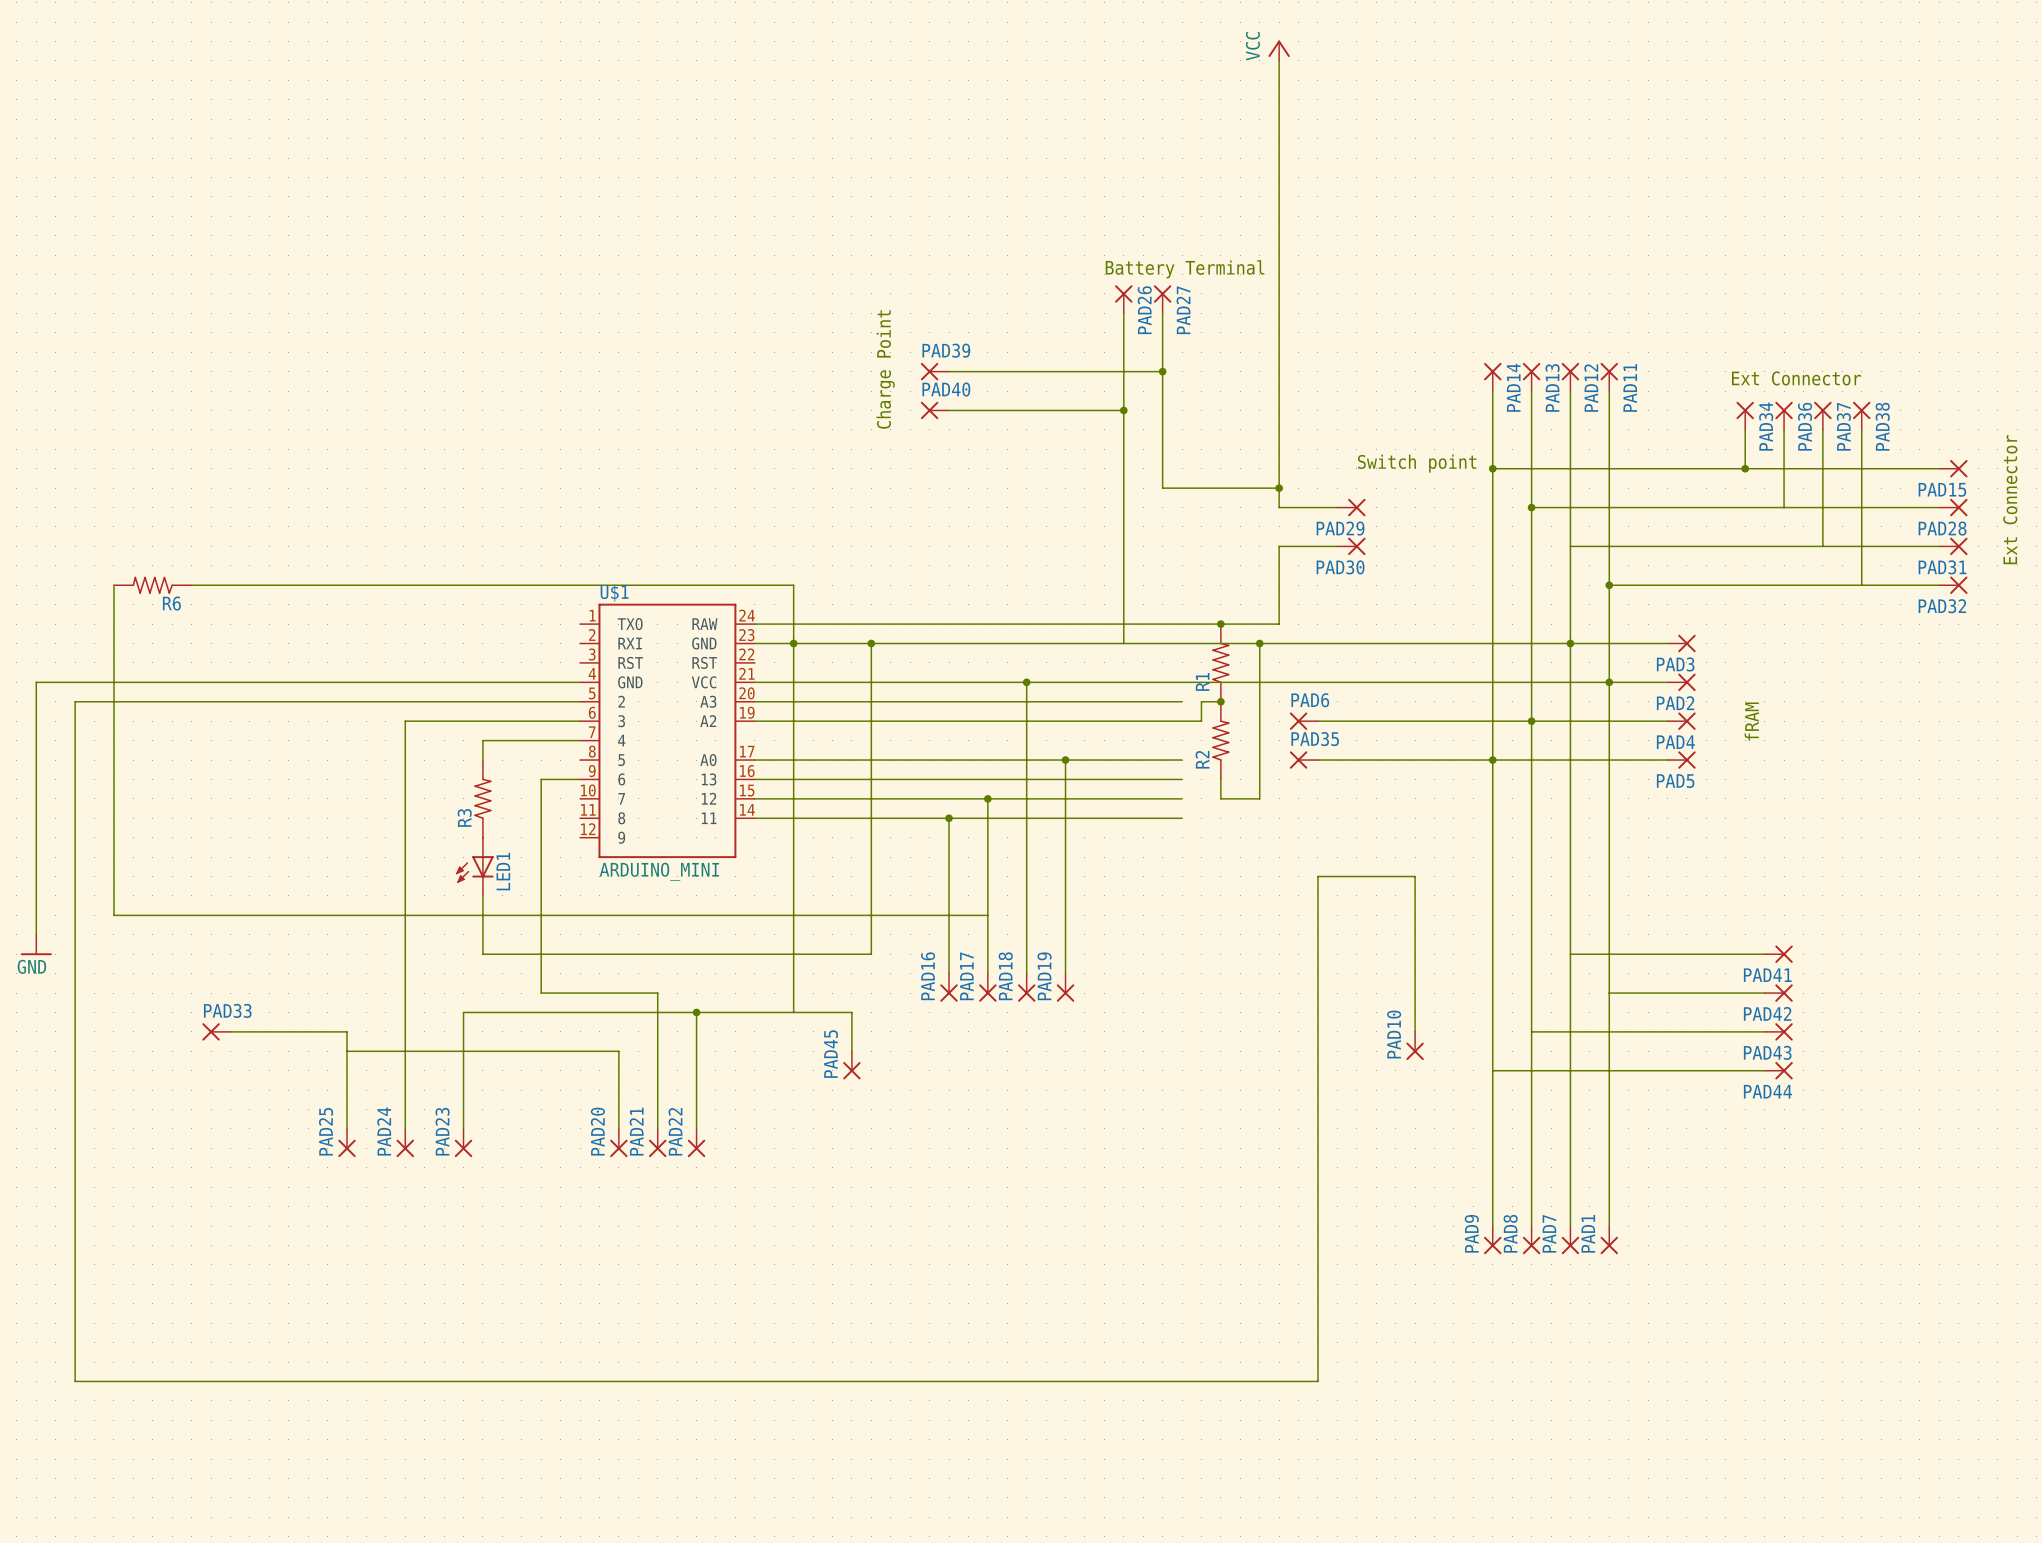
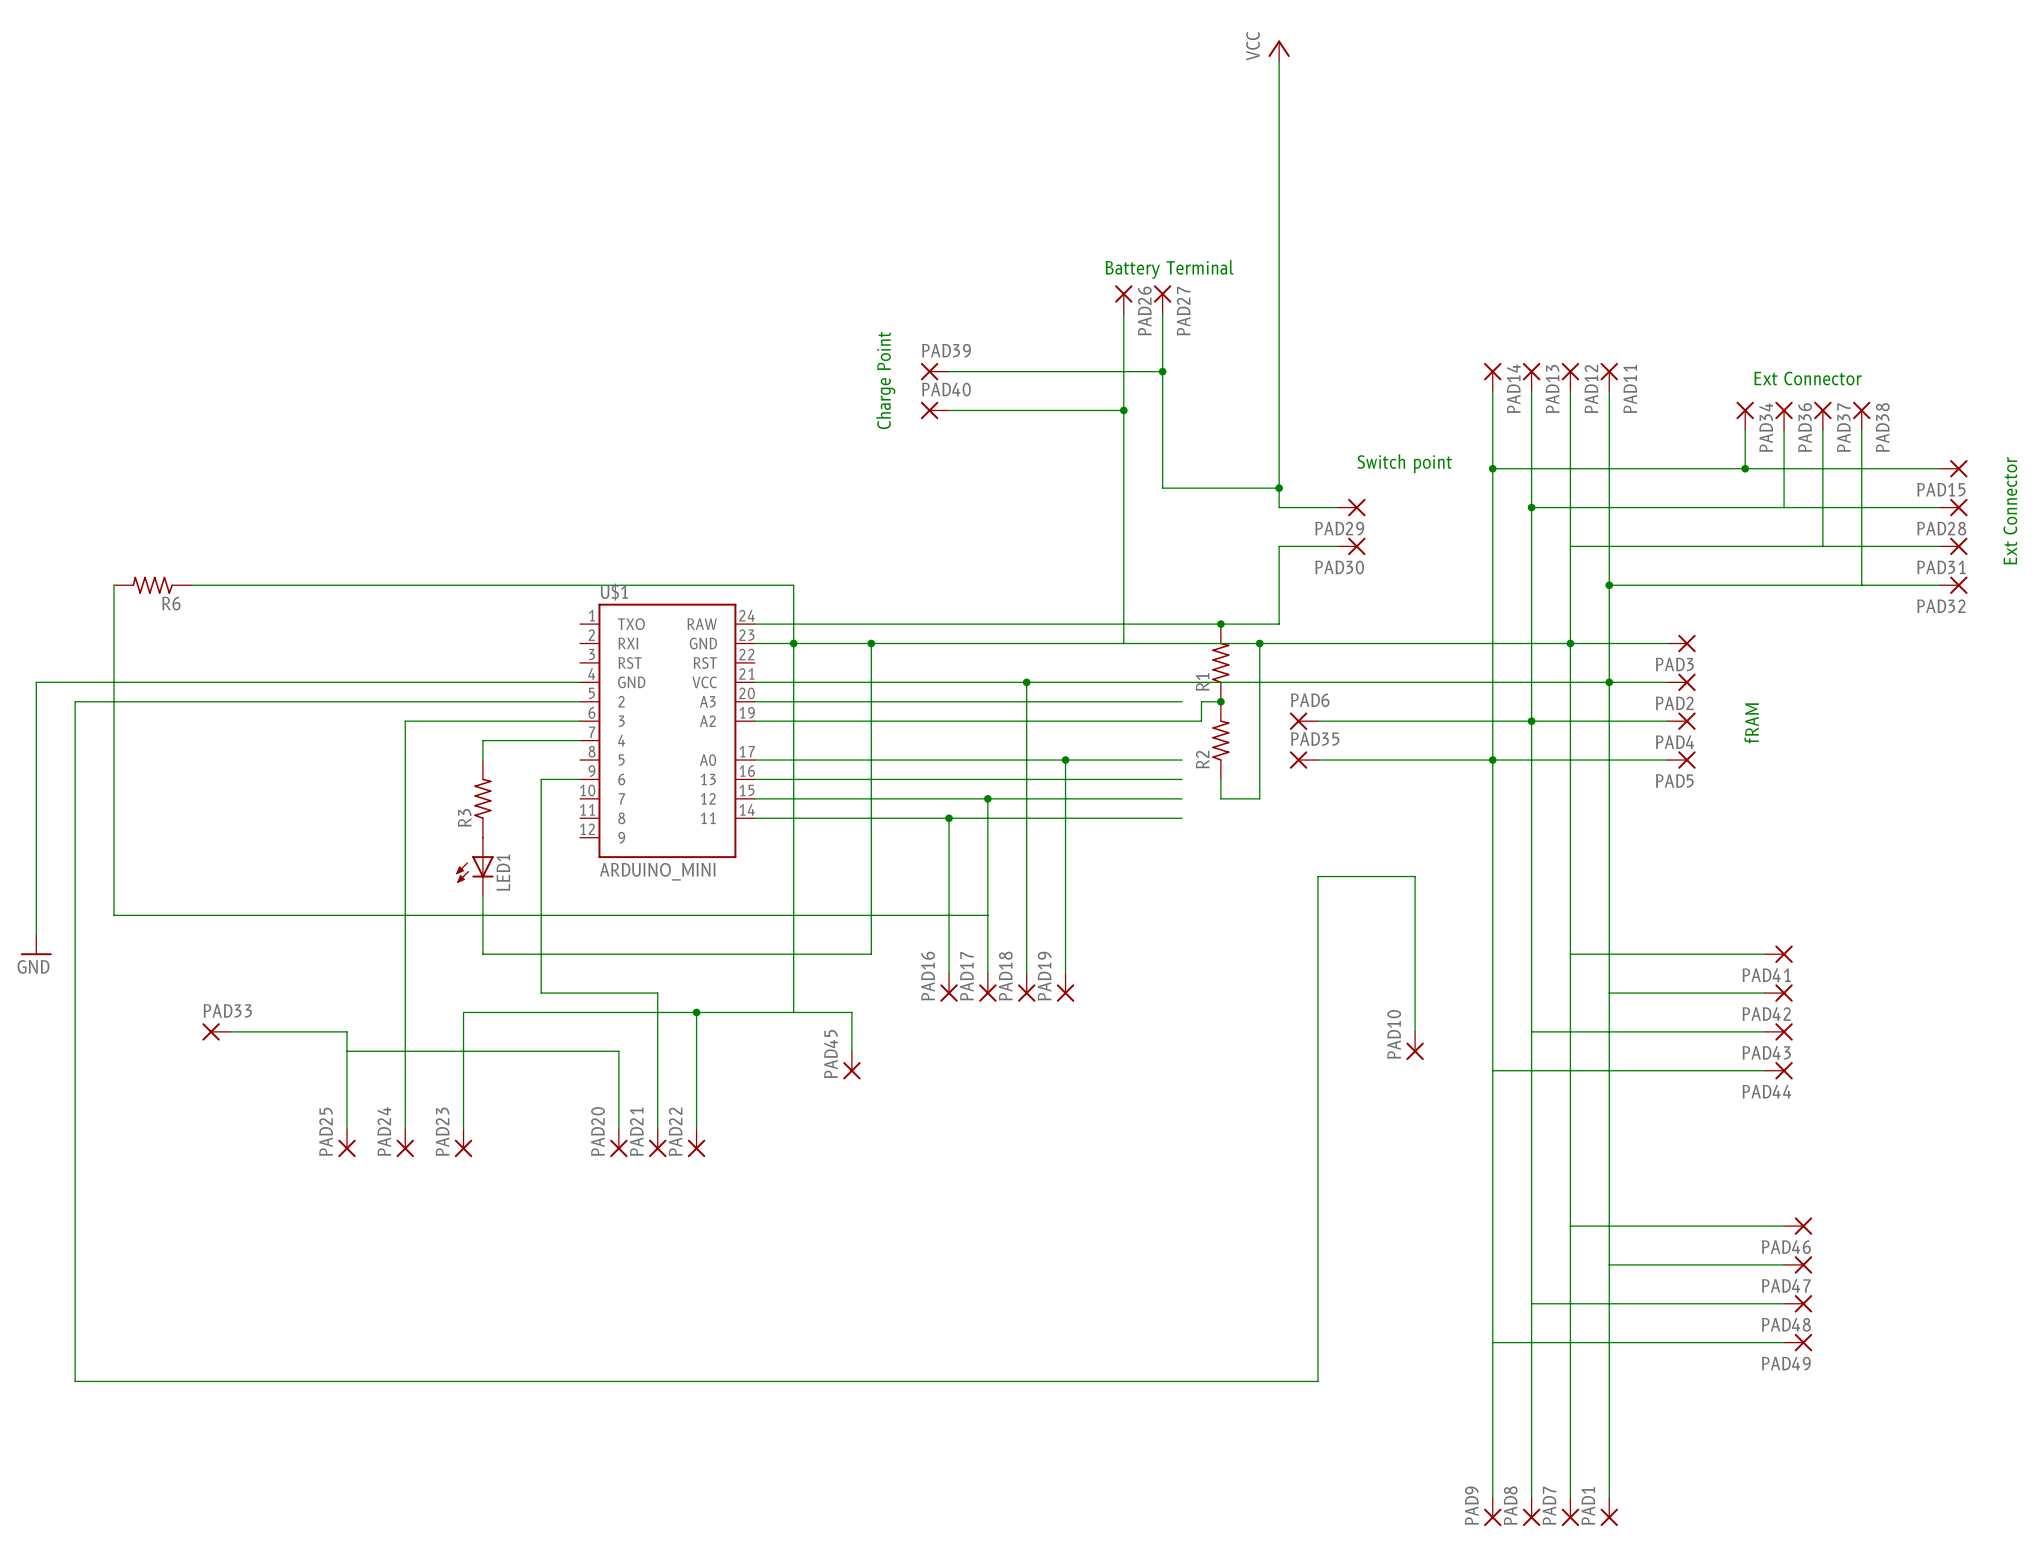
wire: none -> (1492, 1226) (1492, 1497)
wire: none -> (1531, 1226) (1531, 1497)
wire: none -> (1609, 1226) (1609, 1497)
wire: none -> (1784, 1226) (1570, 1226) (1570, 1497)
PAD46: none -> (1798, 1226)
PAD9 position: (1492, 1240) -> (1492, 1512)
PAD8 position: (1531, 1240) -> (1531, 1512)
PAD7 position: (1570, 1240) -> (1570, 1512)
PAD1 position: (1609, 1240) -> (1609, 1512)
wire: none -> (1609, 1264) (1784, 1264)
PAD47: none -> (1798, 1264)
wire: none -> (1531, 1303) (1784, 1303)
PAD48: none -> (1798, 1303)
wire: none -> (1492, 1342) (1784, 1342)
PAD49: none -> (1798, 1342)

